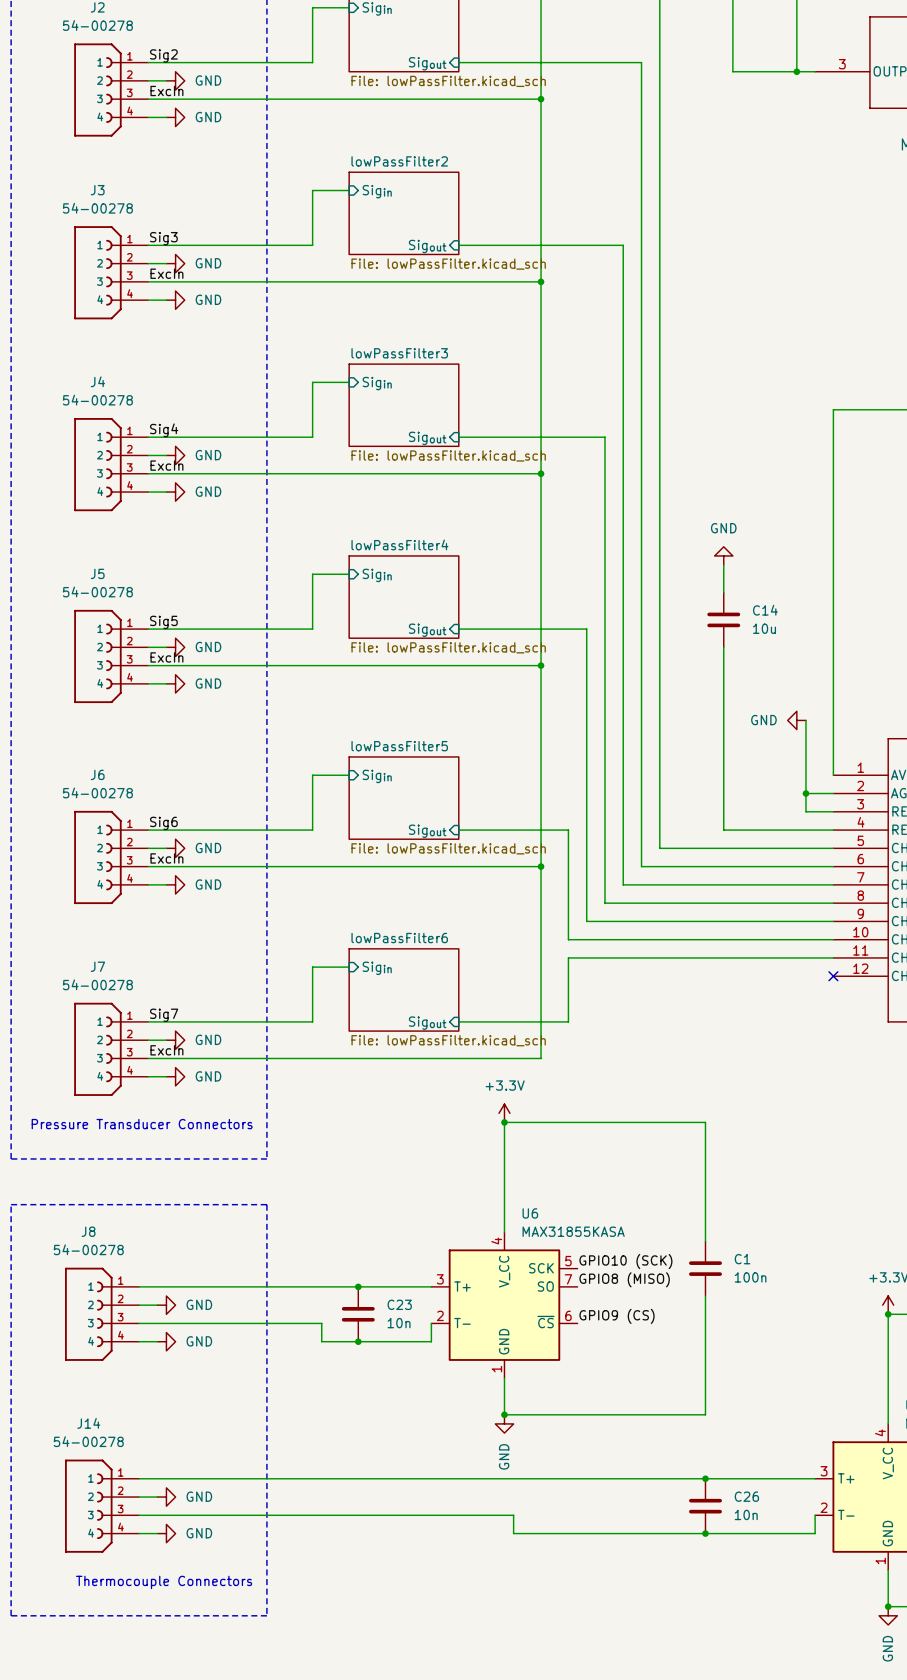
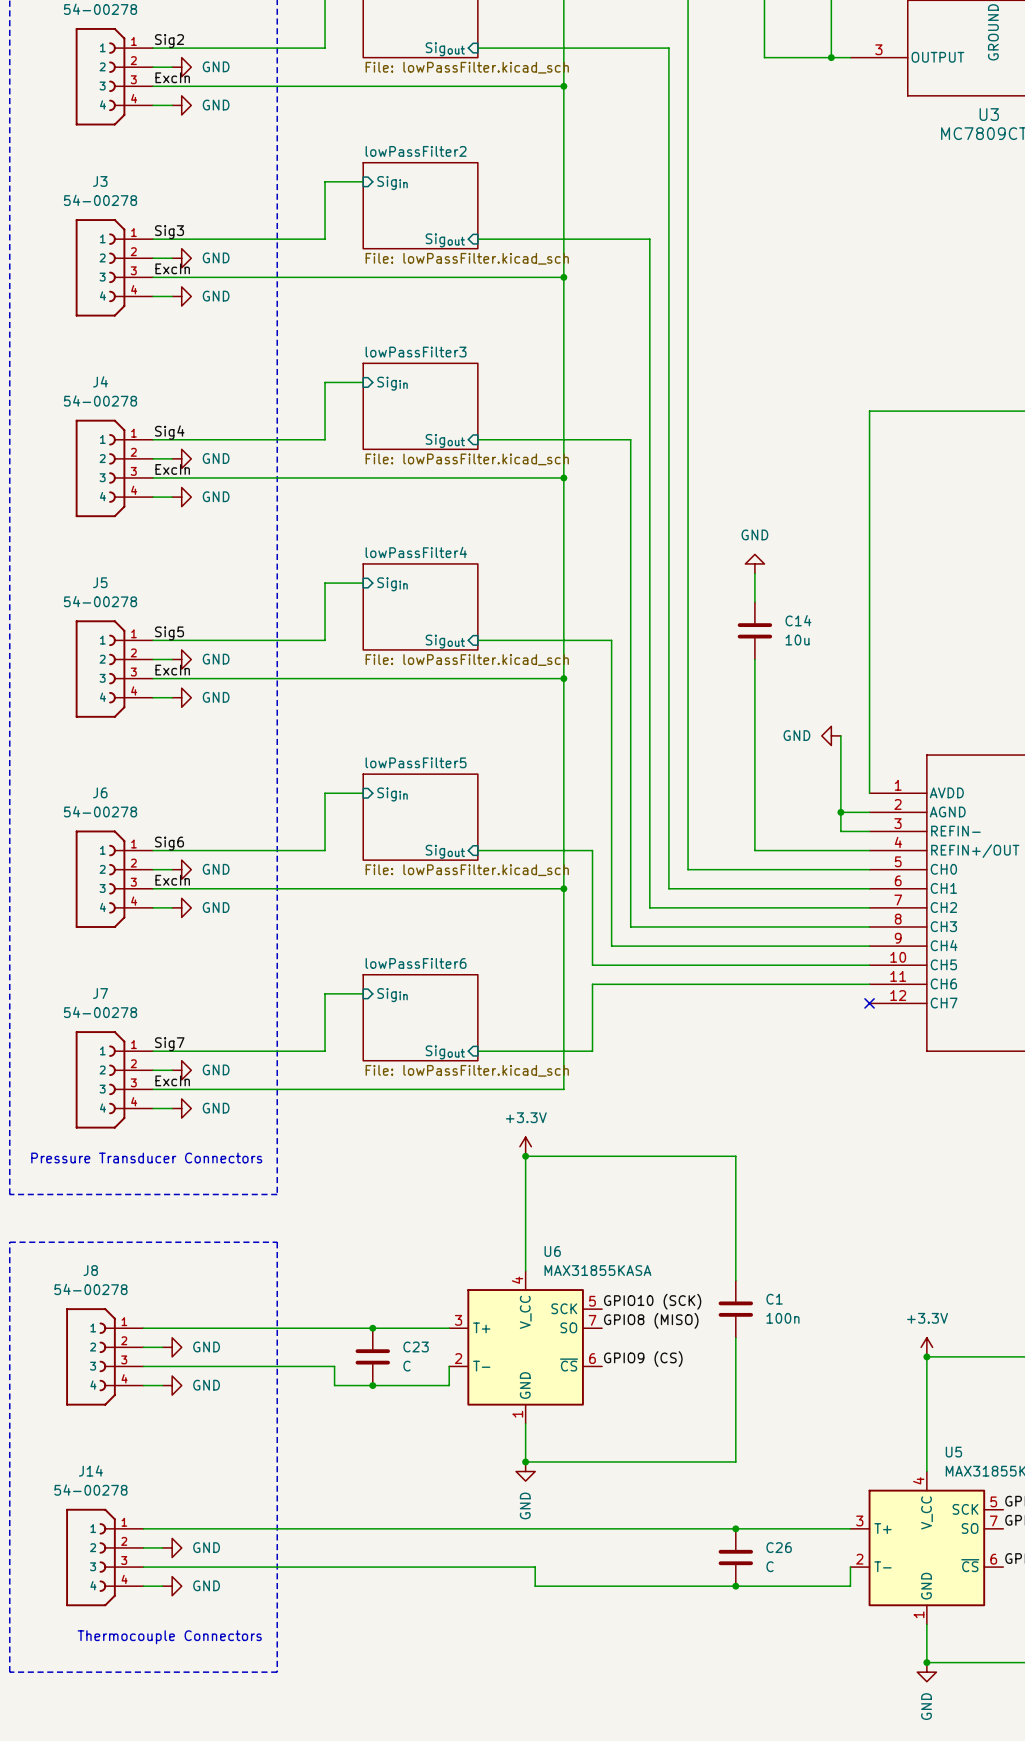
C23 value: 10n (399, 1323) -> C (406, 1366)
C26 value: 10n (746, 1514) -> C (770, 1566)

